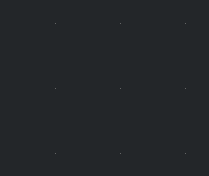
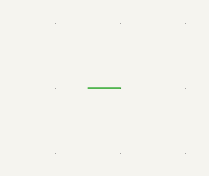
wire: none -> (88, 88) (120, 88)

